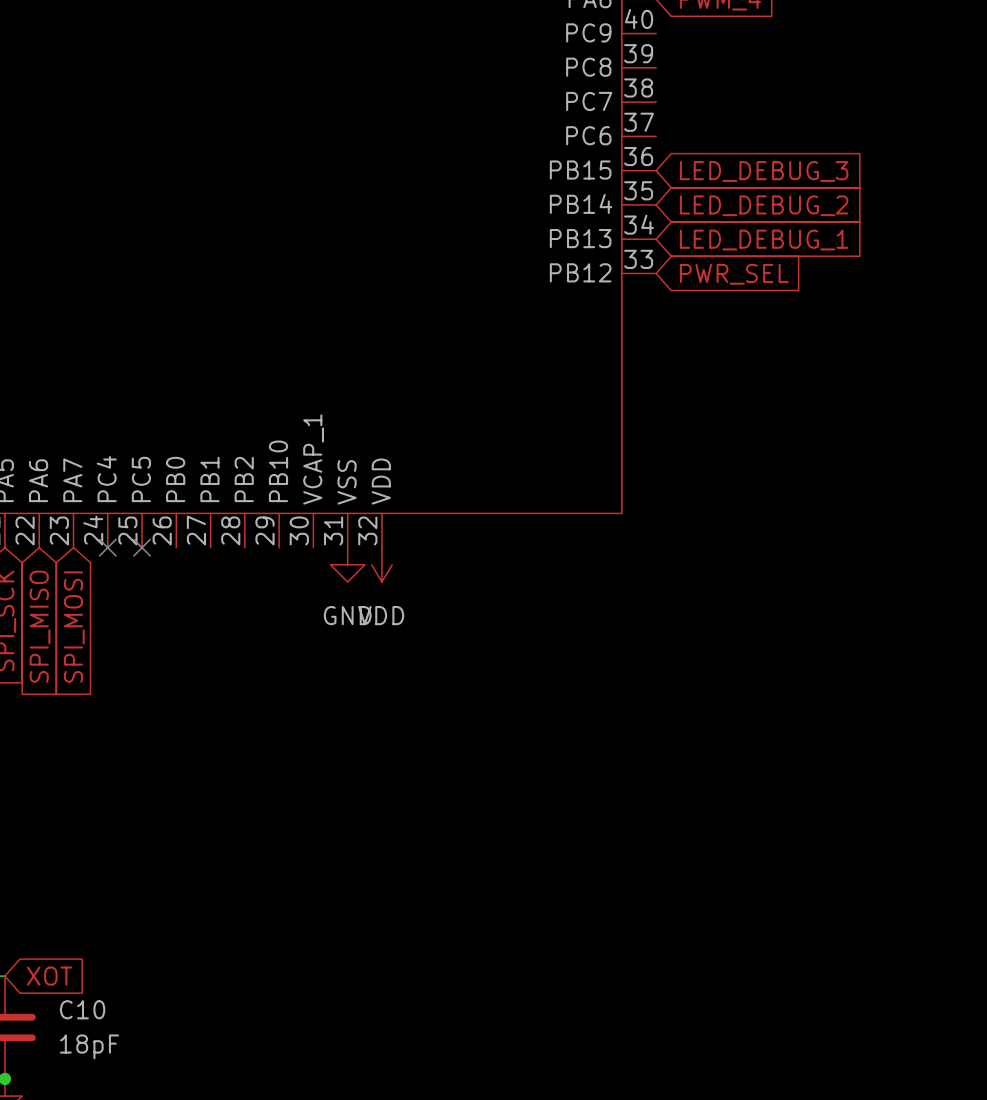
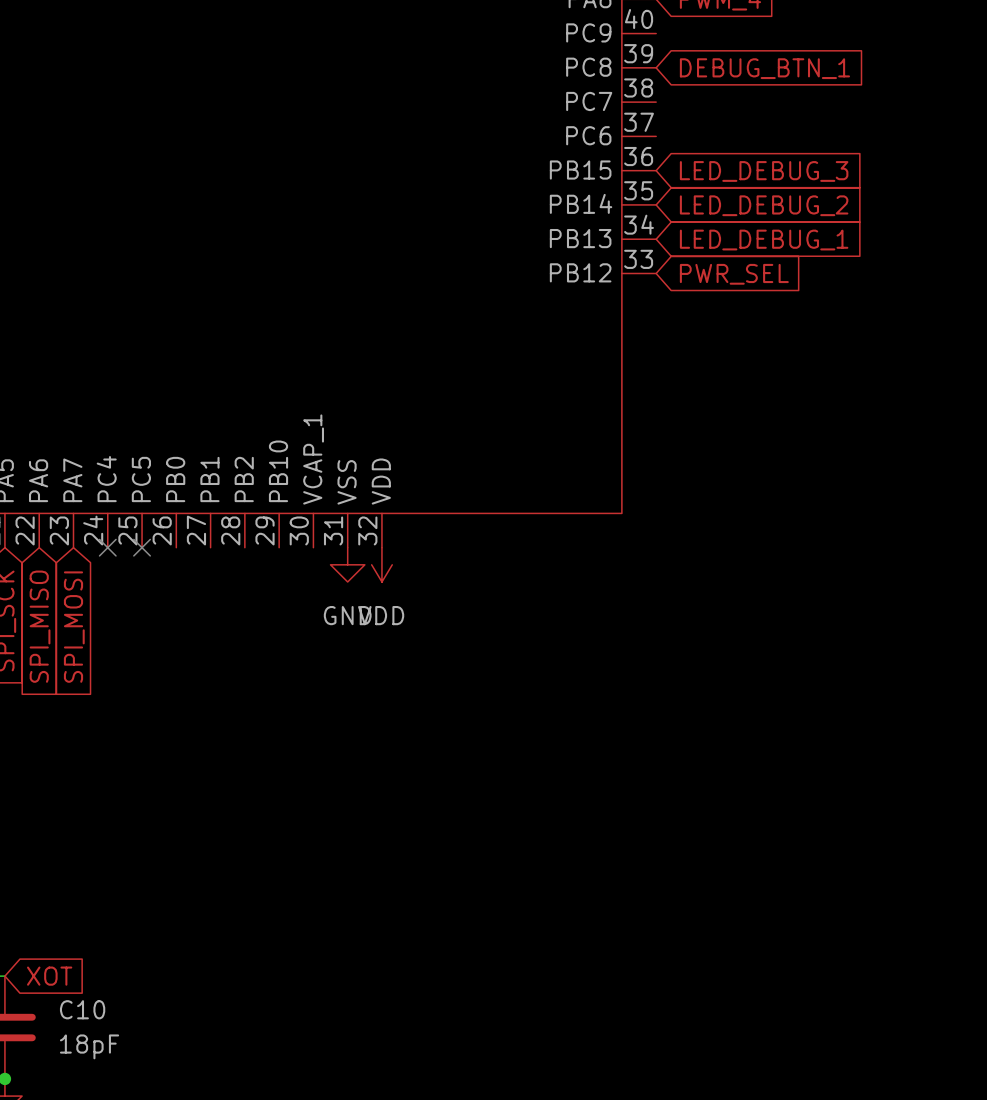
global label: none -> DEBUG_BTN_1 (764, 68)

